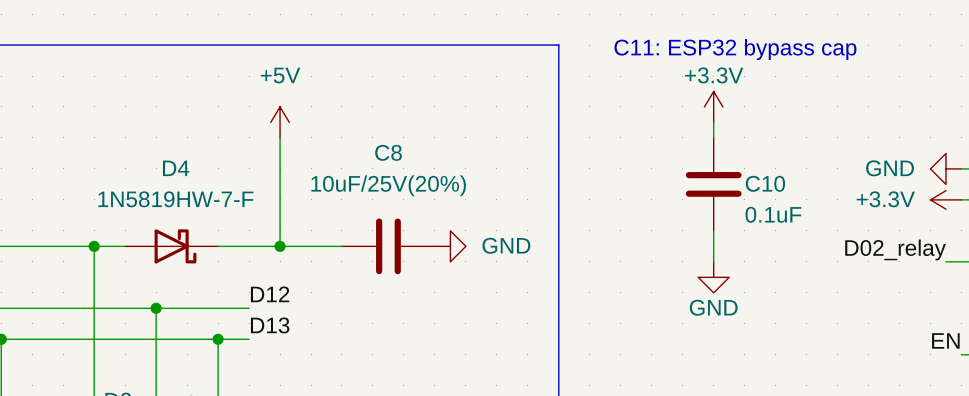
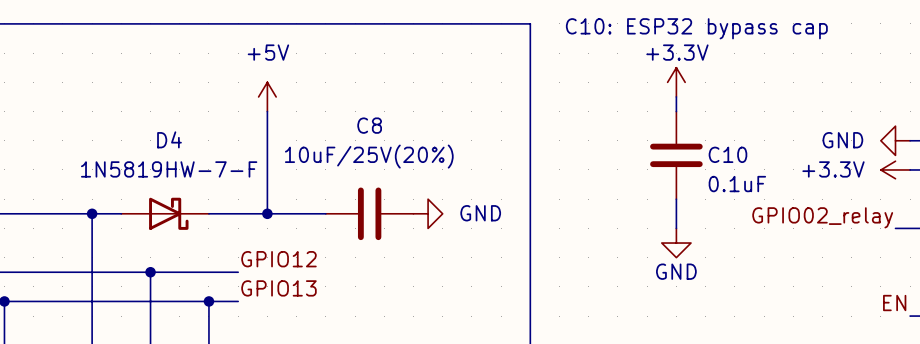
text: C11: ESP32 bypass cap (735, 49) -> C10: ESP32 bypass cap (696, 28)
label: D02_relay (895, 249) -> GPIO02_relay (822, 217)
label: D12 (270, 294) -> GPIO12 (278, 259)
label: D13 (270, 325) -> GPIO13 (278, 288)

